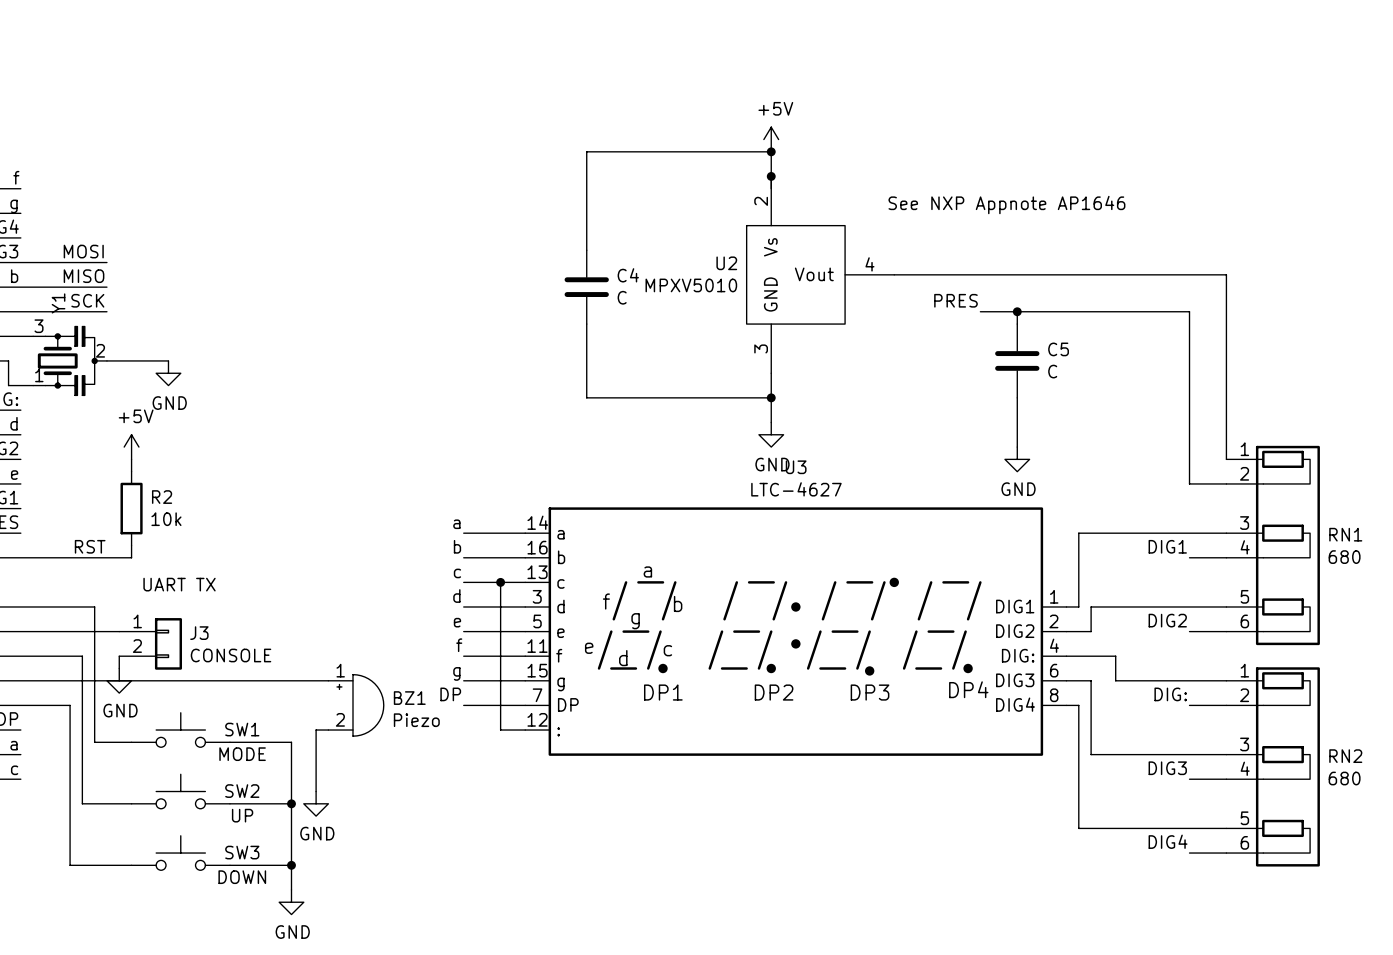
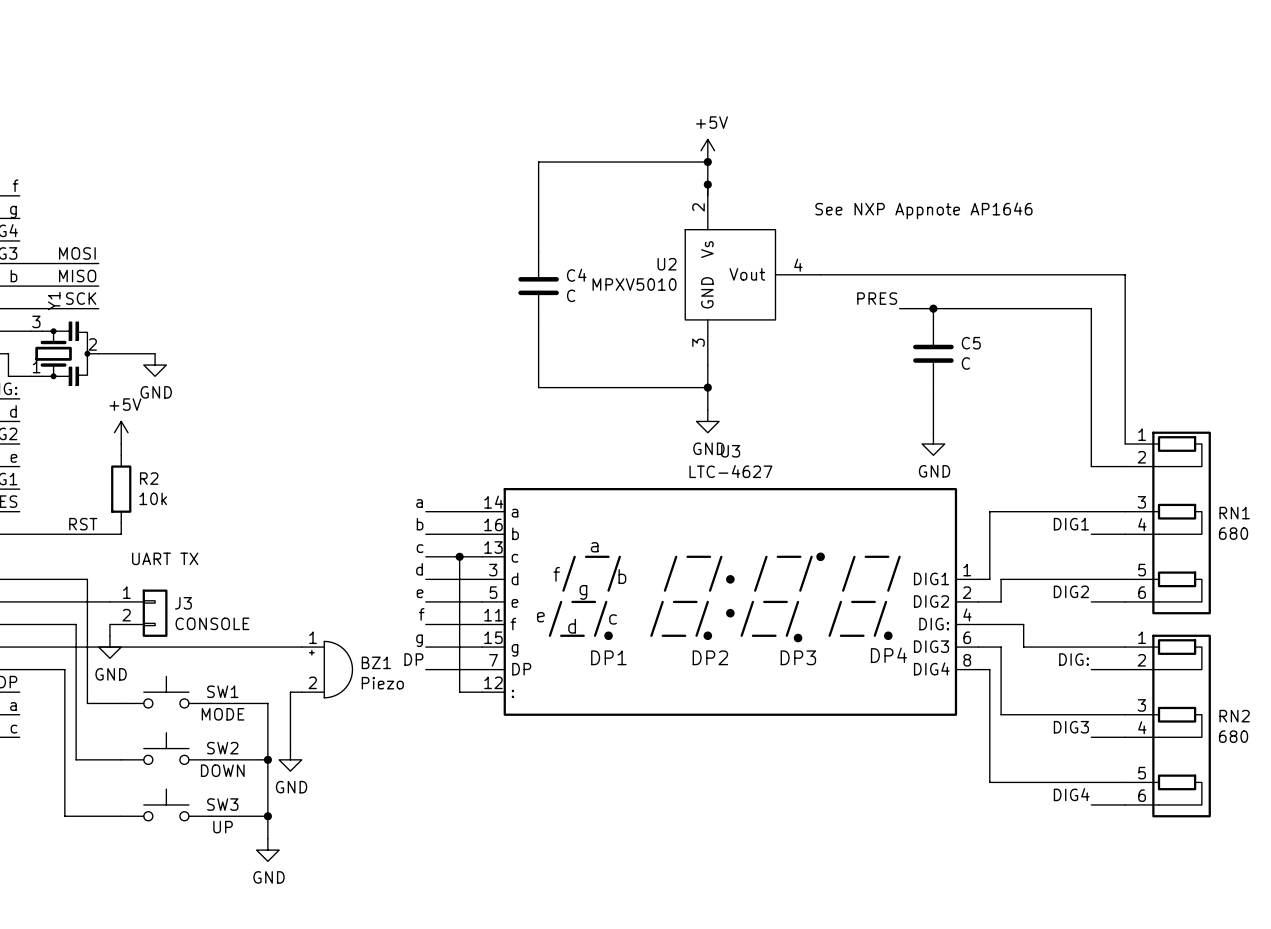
SW2 value: UP (242, 815) -> DOWN (222, 770)
SW3 value: DOWN (242, 877) -> UP (223, 827)

